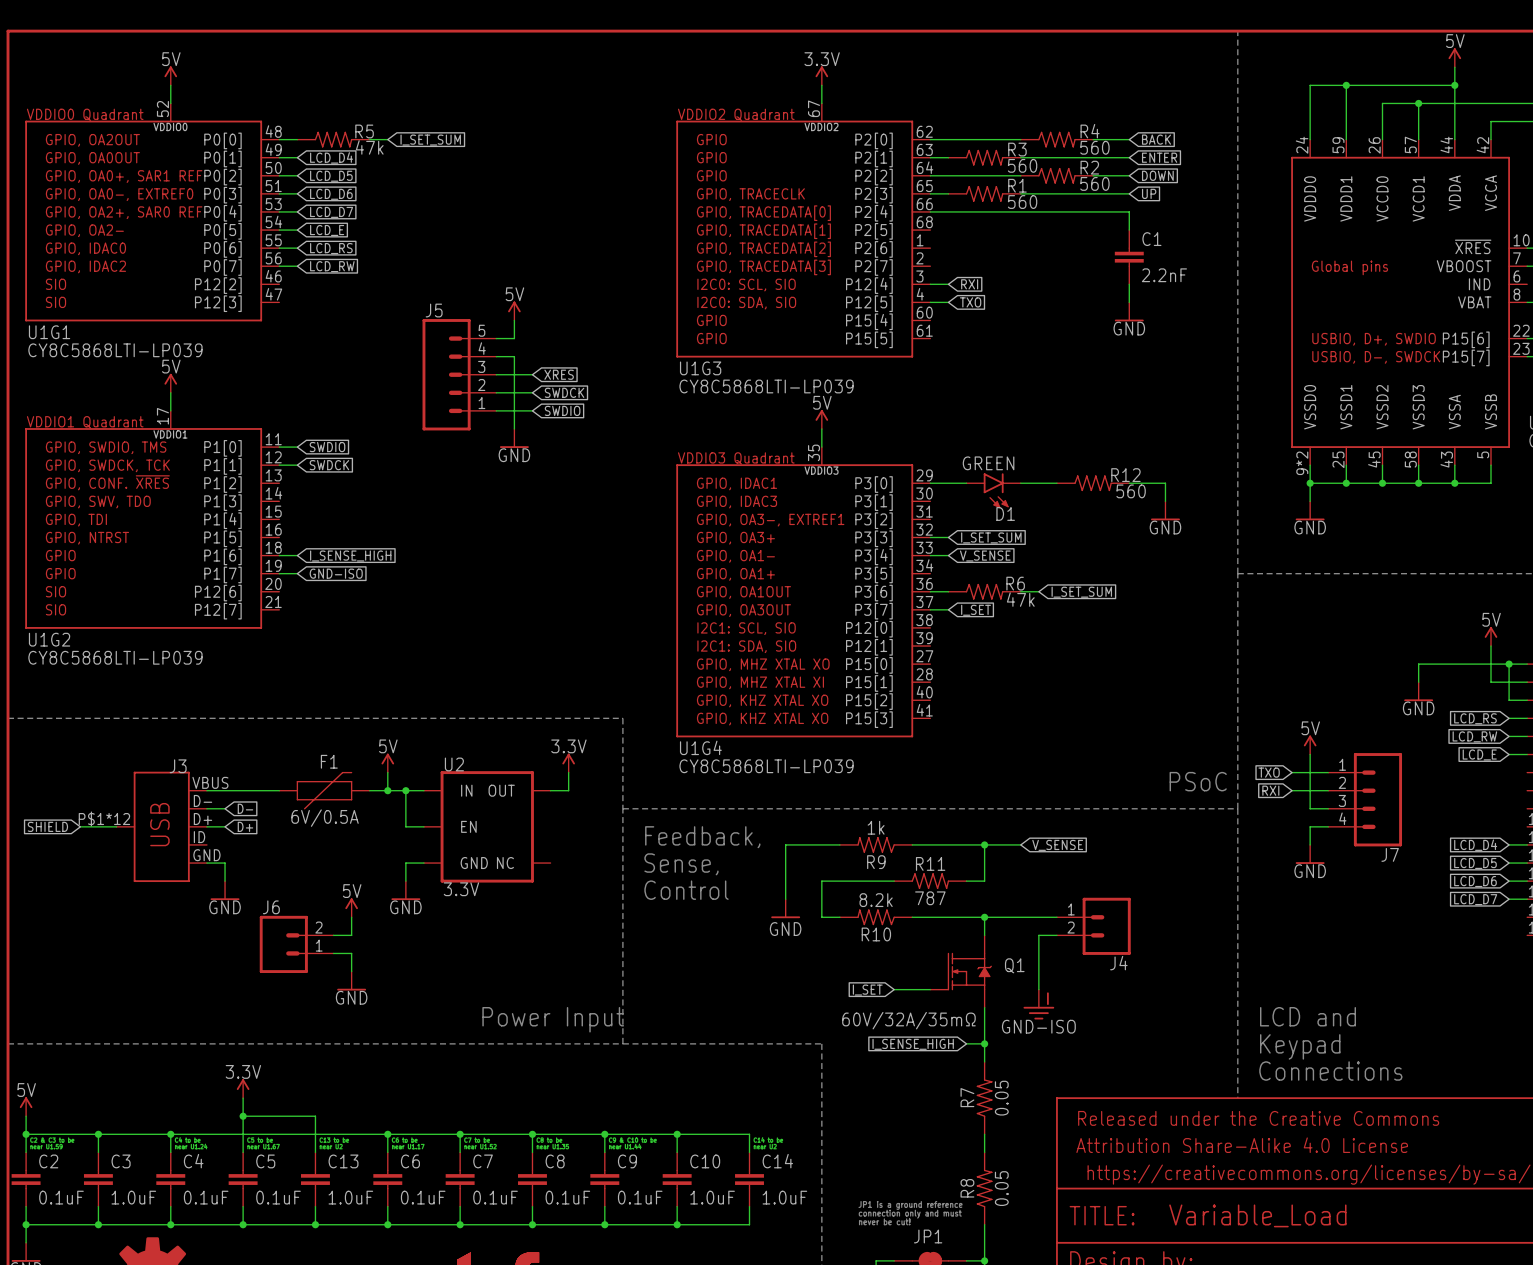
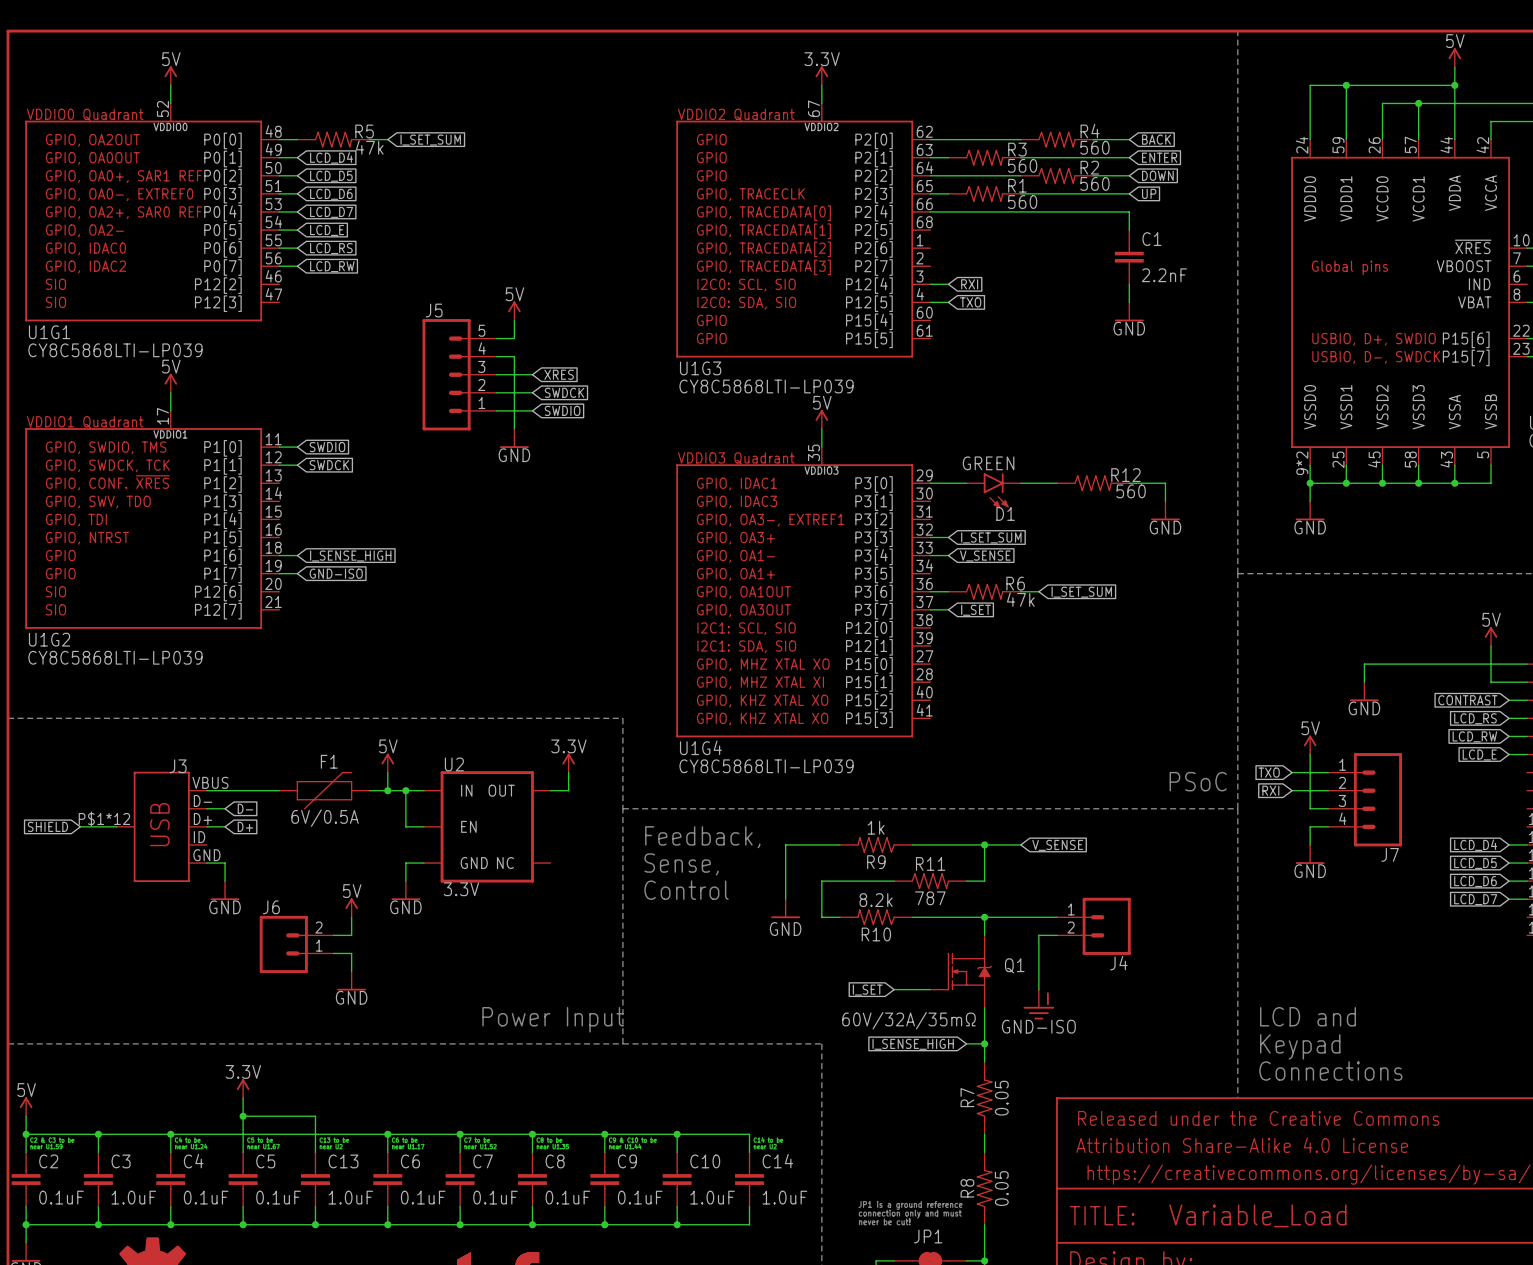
wire: (1418, 664) (1418, 682) -> (1418, 664) (1364, 664) (1364, 682)
wire: (1509, 664) (1509, 700) -> none
junction: (1509, 664) -> none
power symbol position: GND (1418, 691) -> GND (1364, 691)
global label: none -> CONTRAST (1467, 700)

